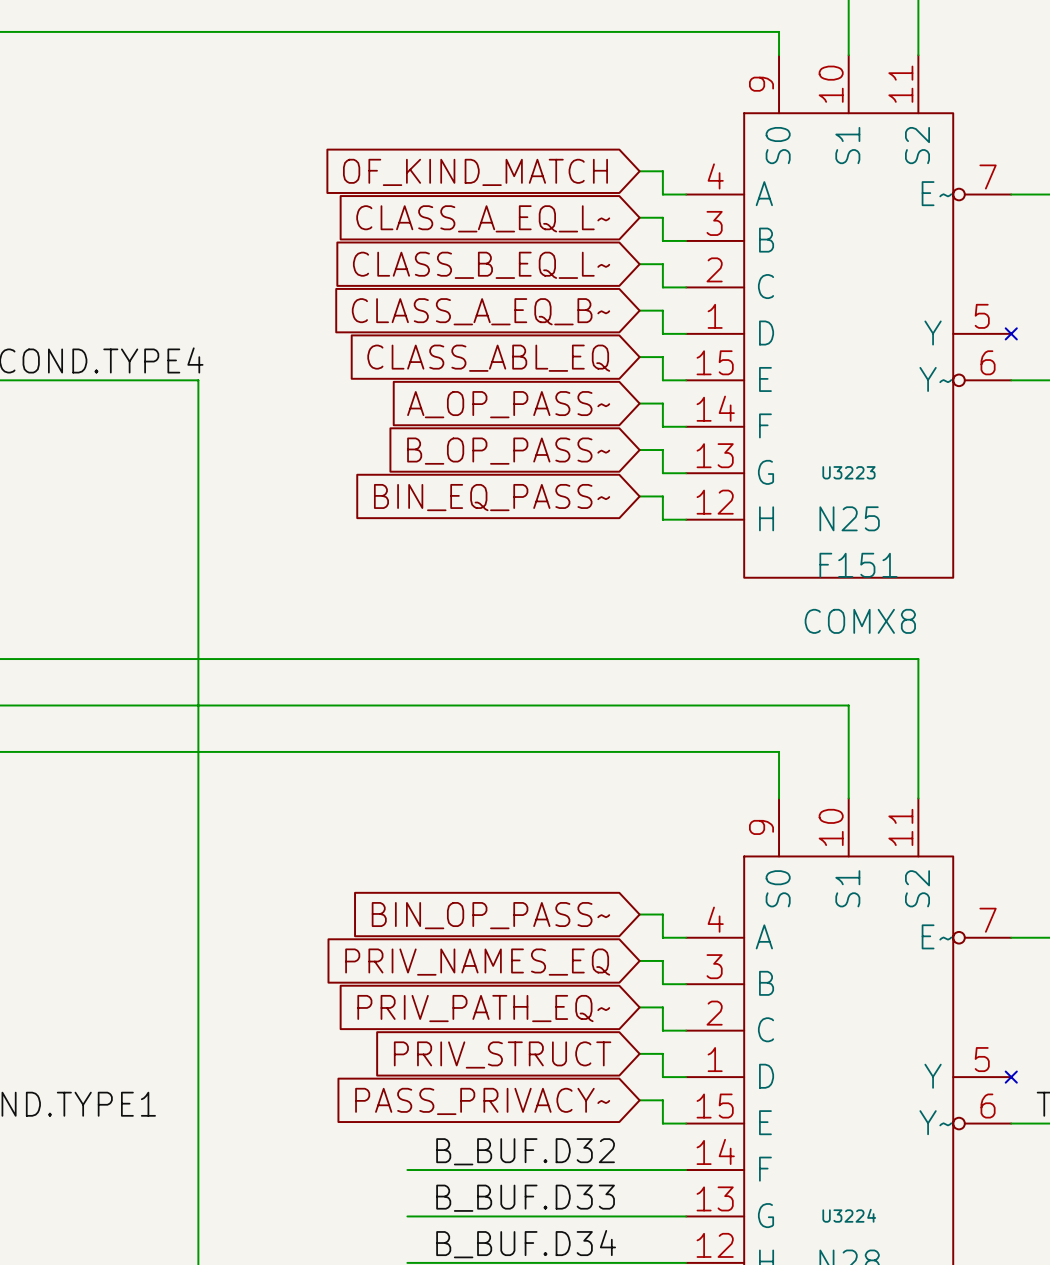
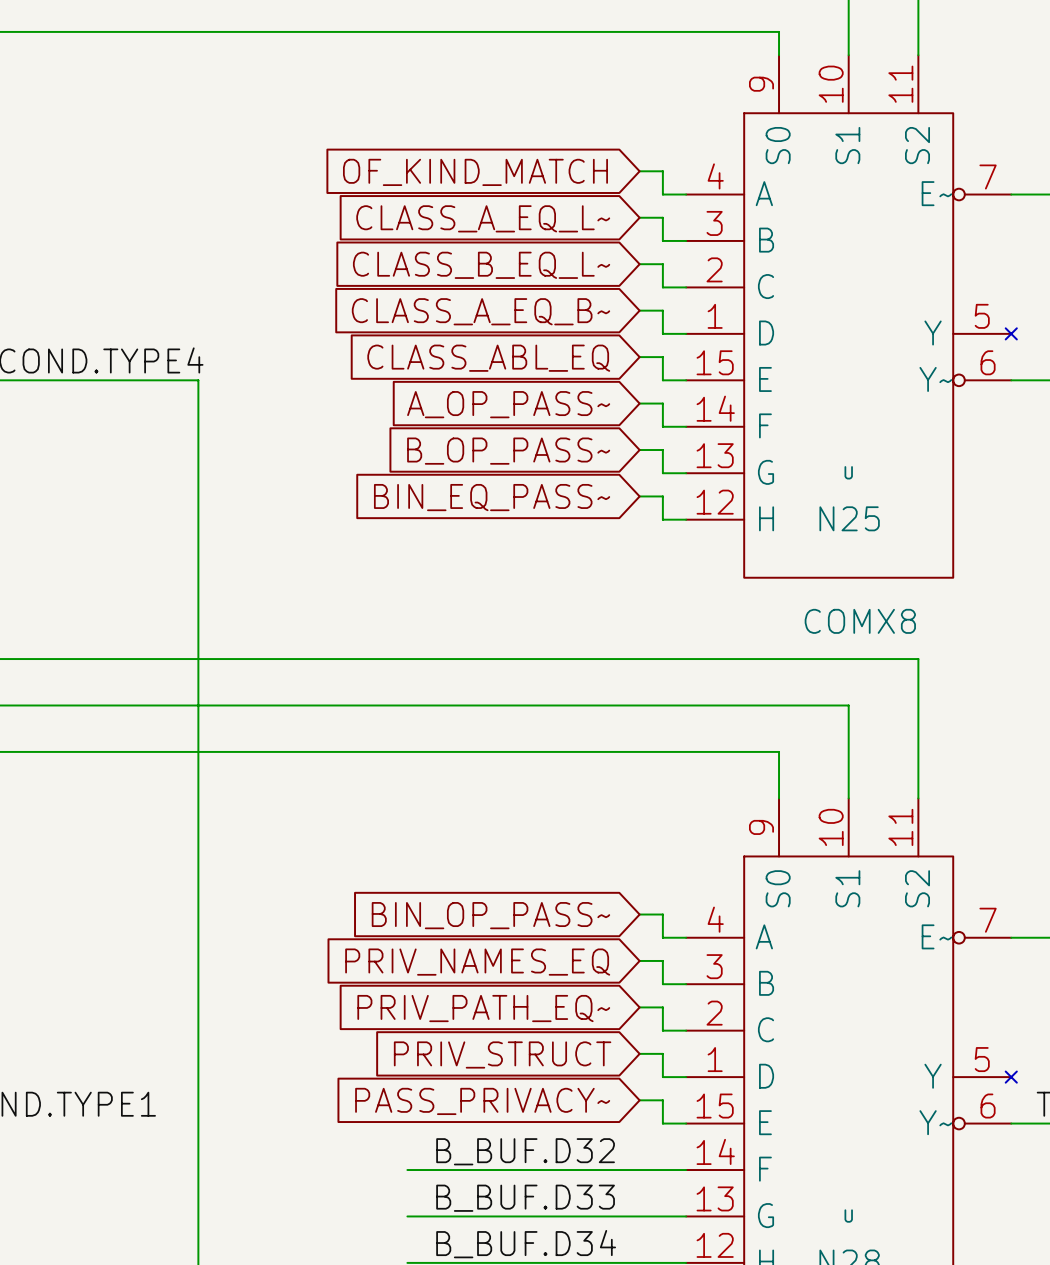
U3223 name: U3223 (848, 472) -> U (848, 472)
U3223 value: F151 (858, 565) -> none
U3224 name: U3224 (849, 1215) -> U (848, 1216)

